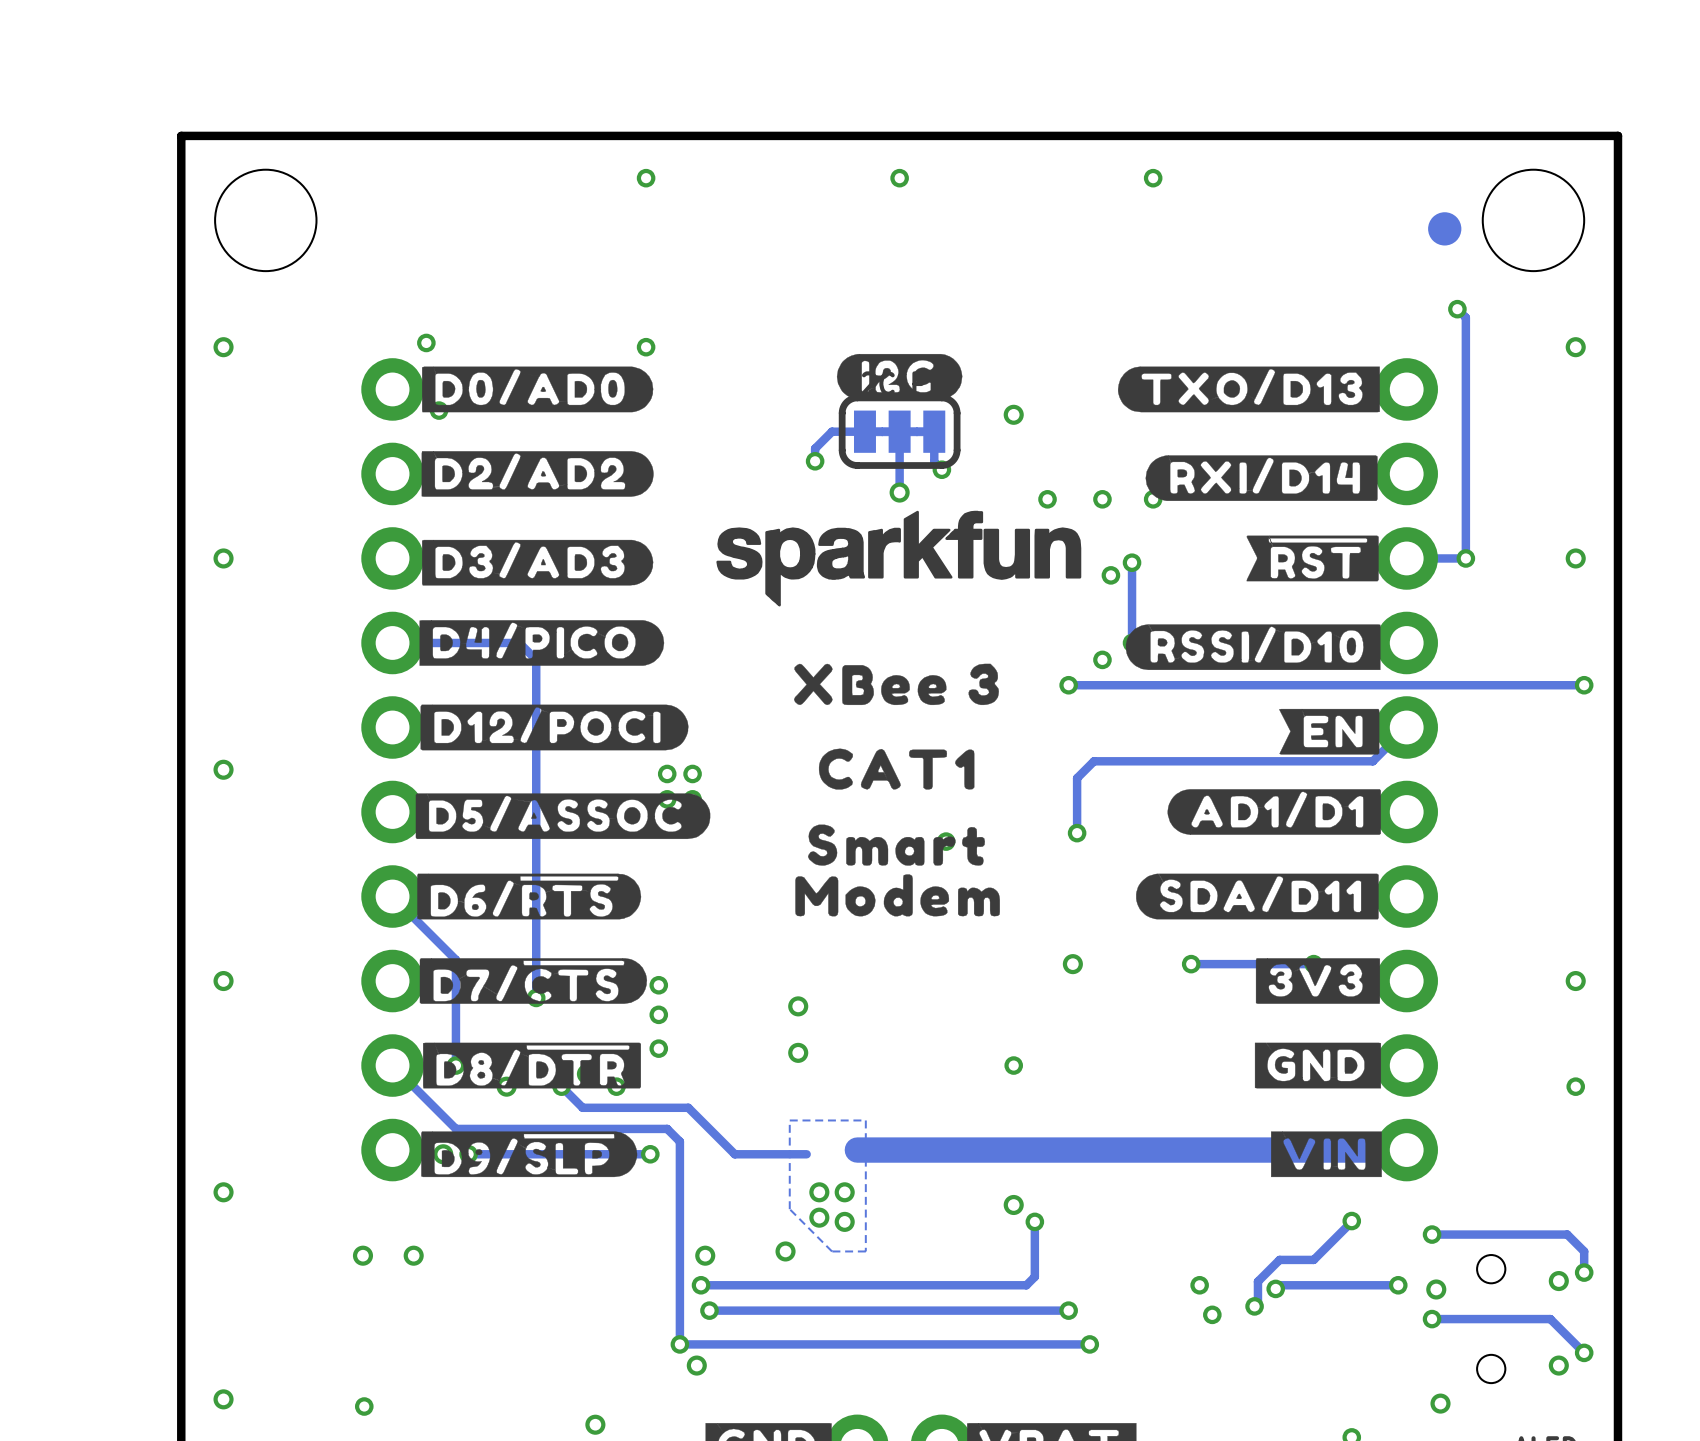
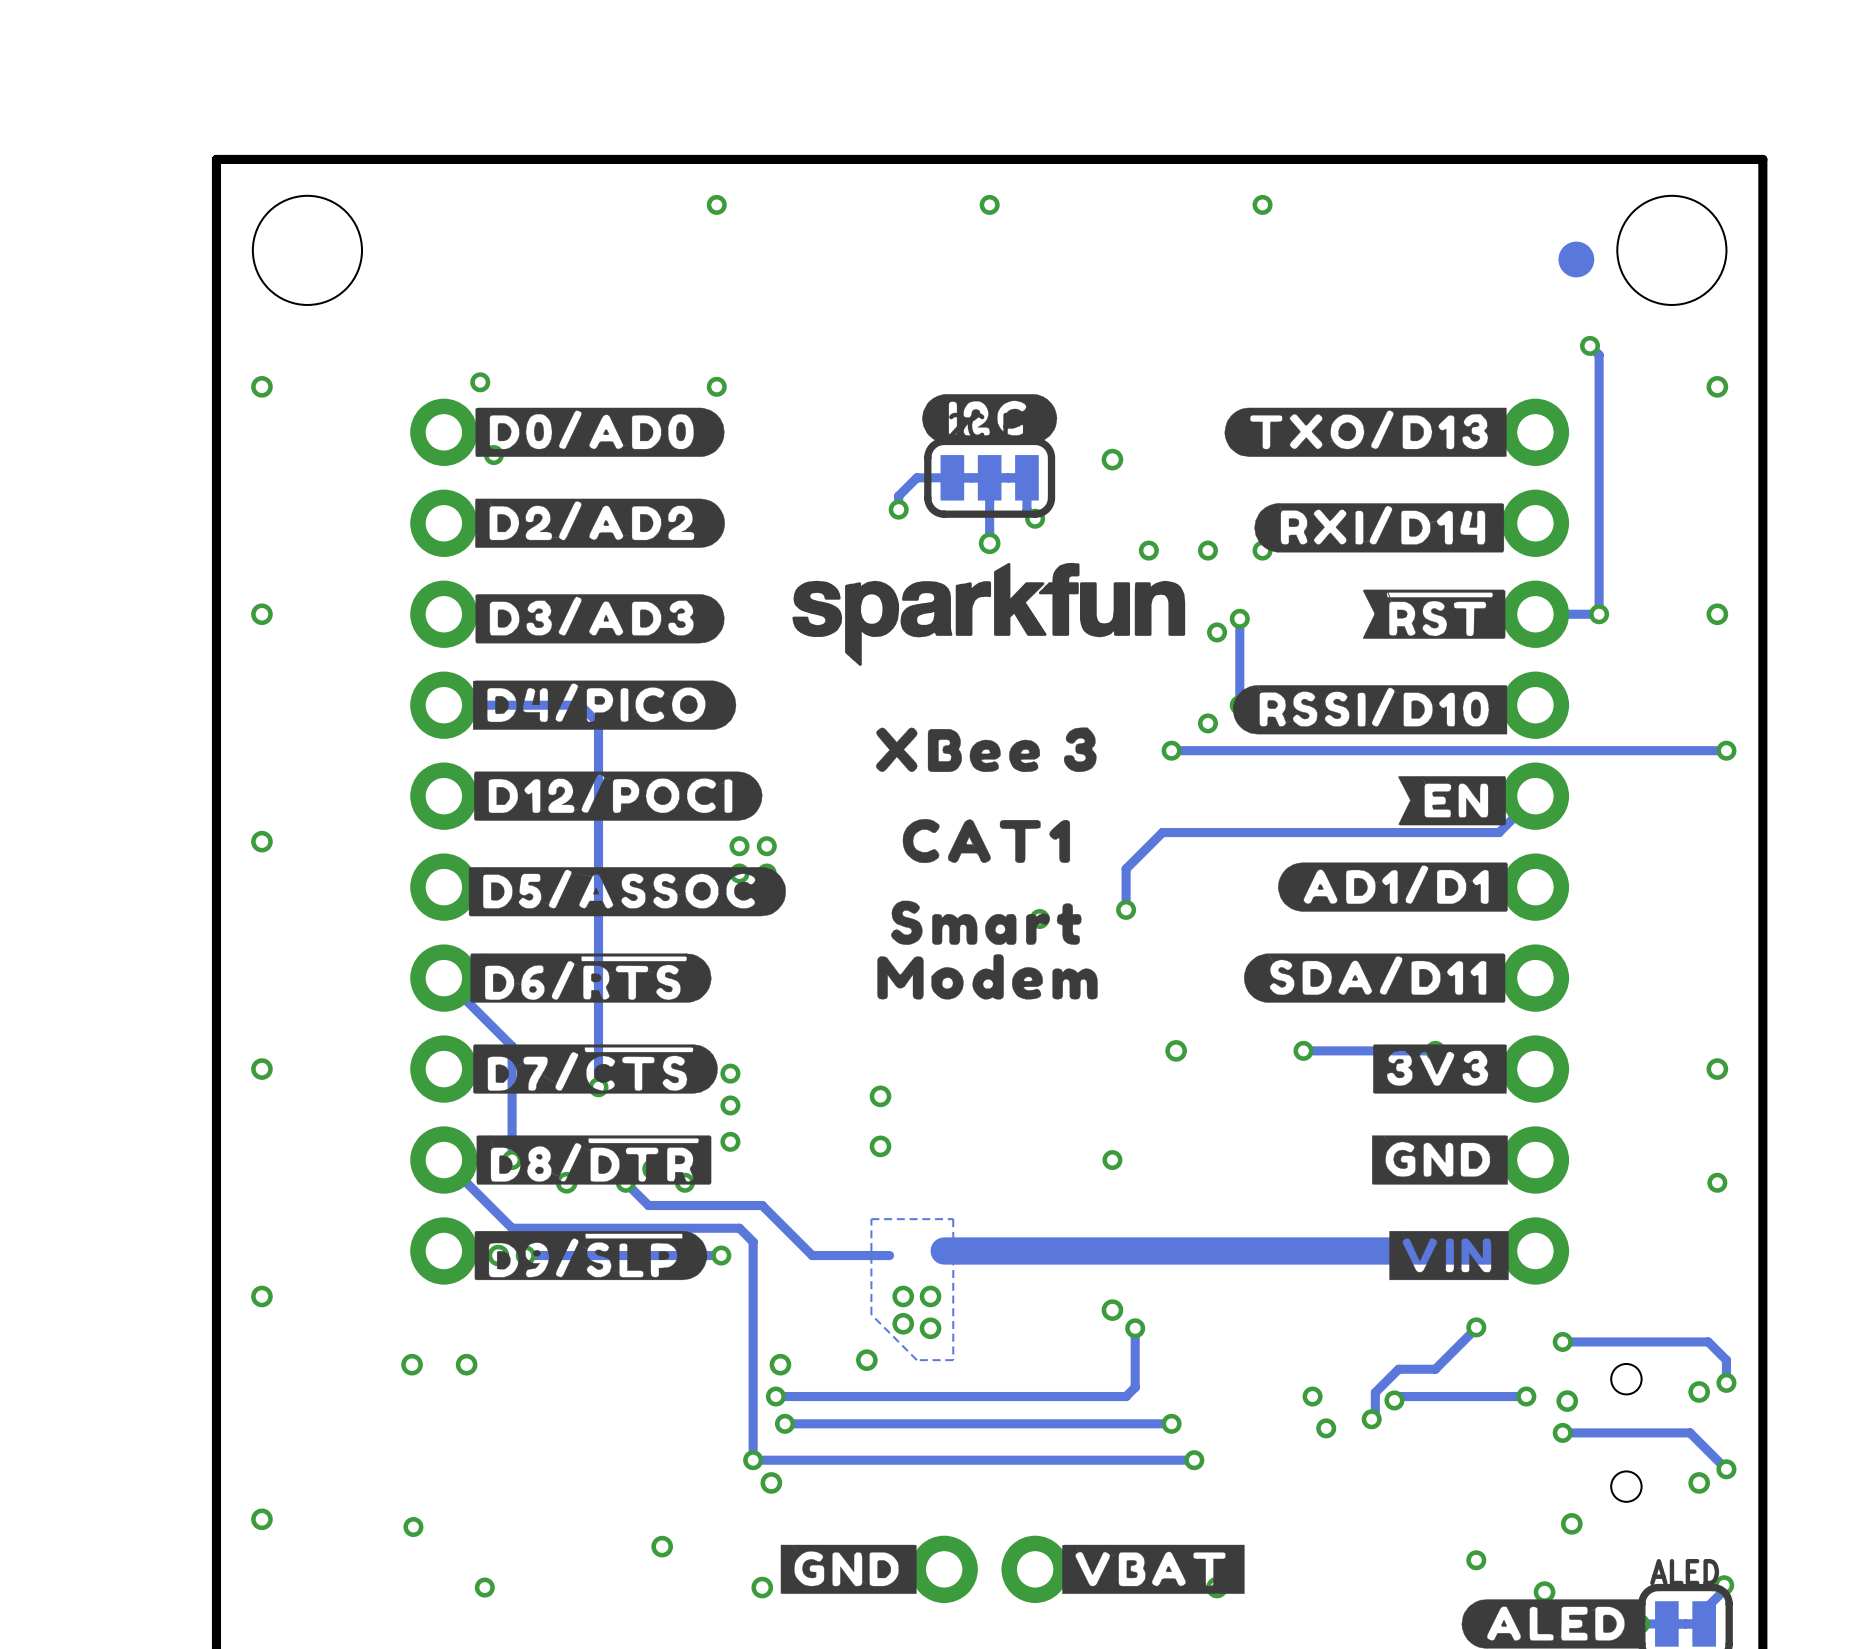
track: (1094, 761) (1077, 778) (1077, 833) -> (1198, 832) (1162, 832) (1126, 868) (1126, 909)
via position: (1077, 833) -> (1126, 909)

